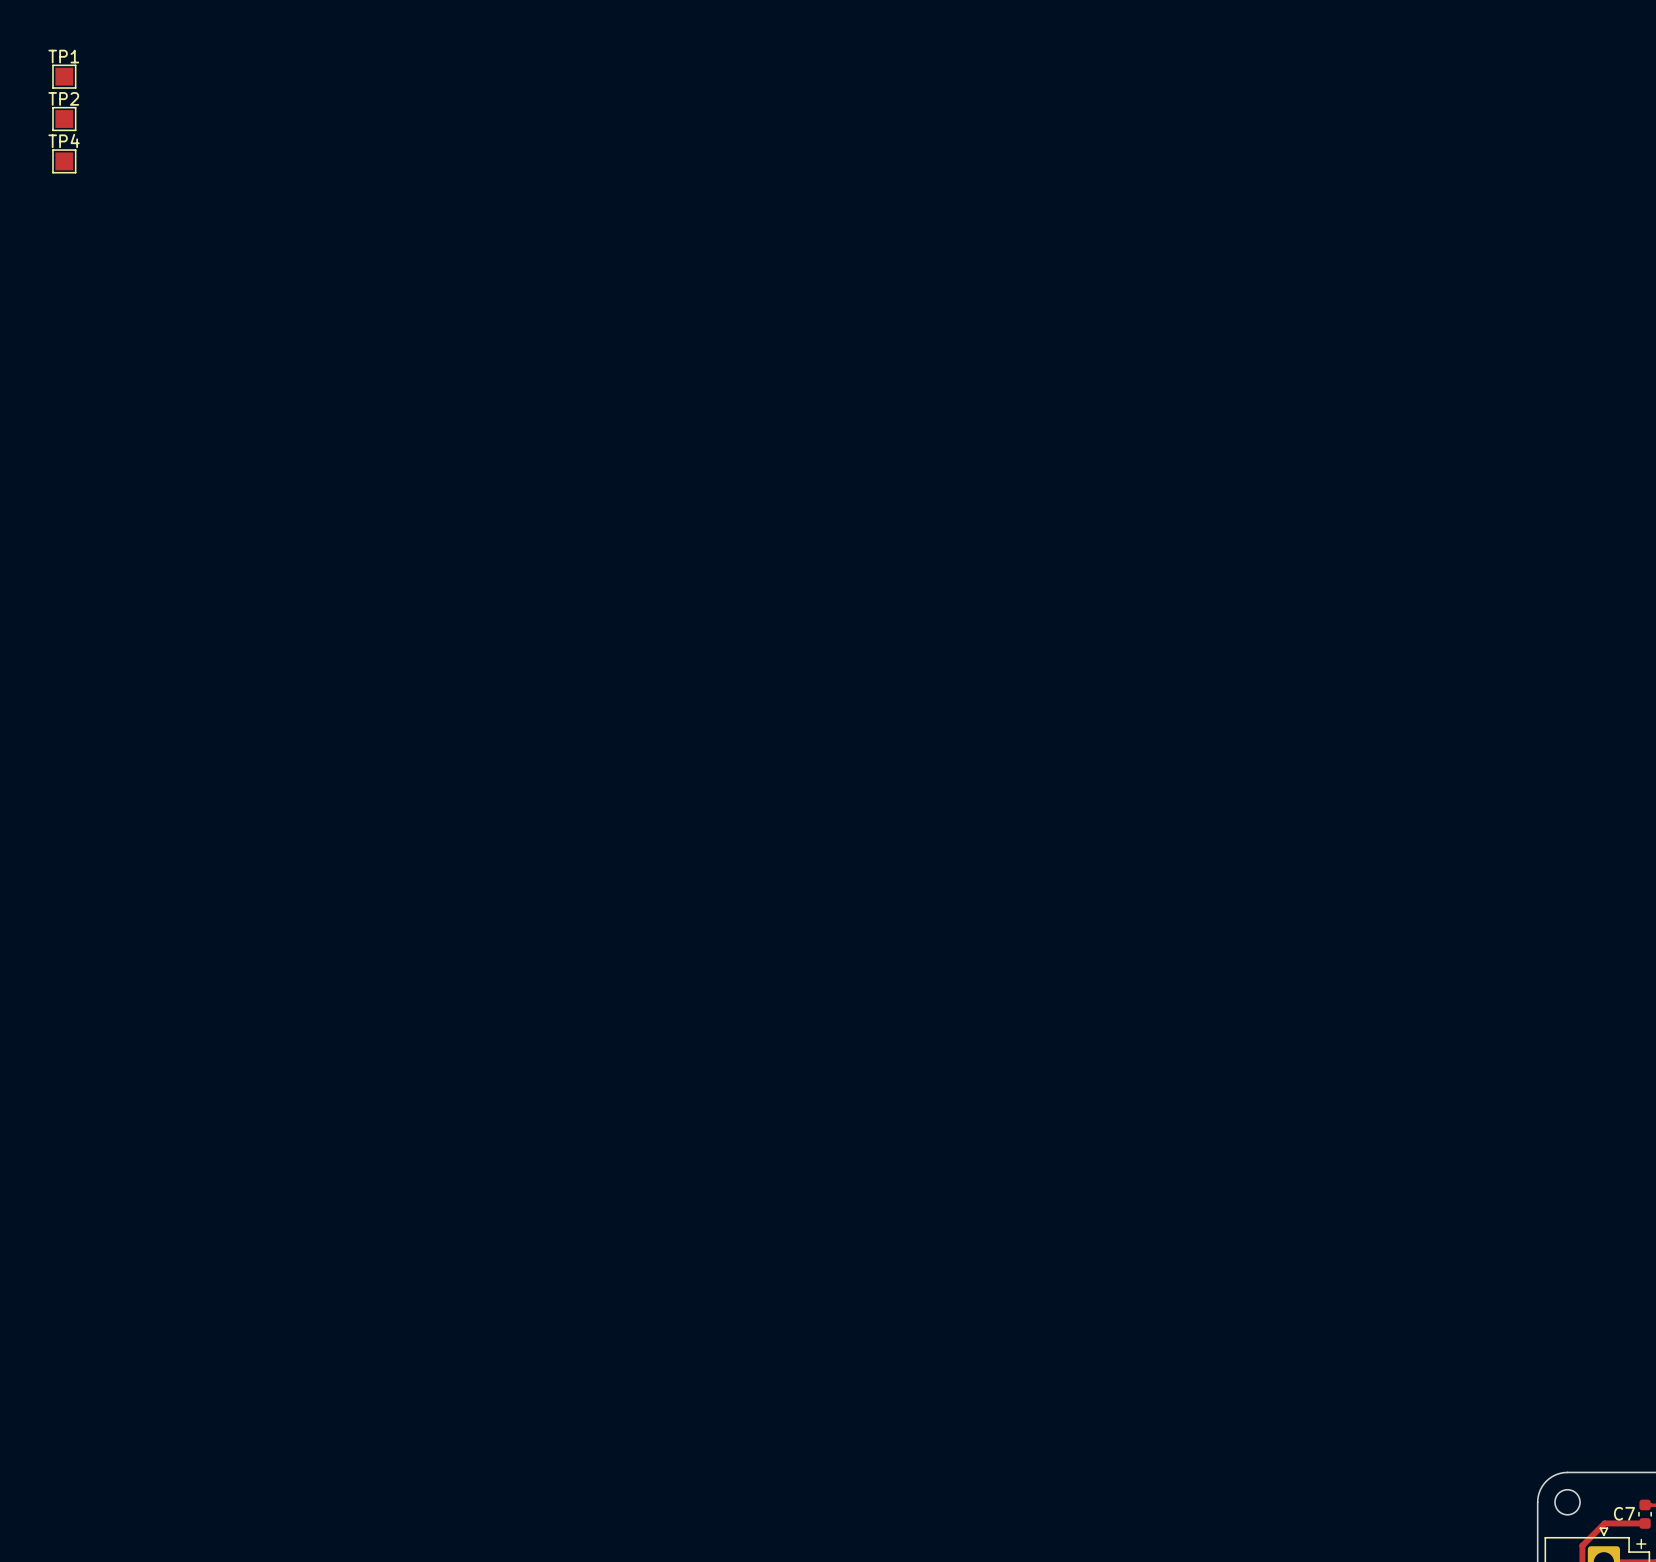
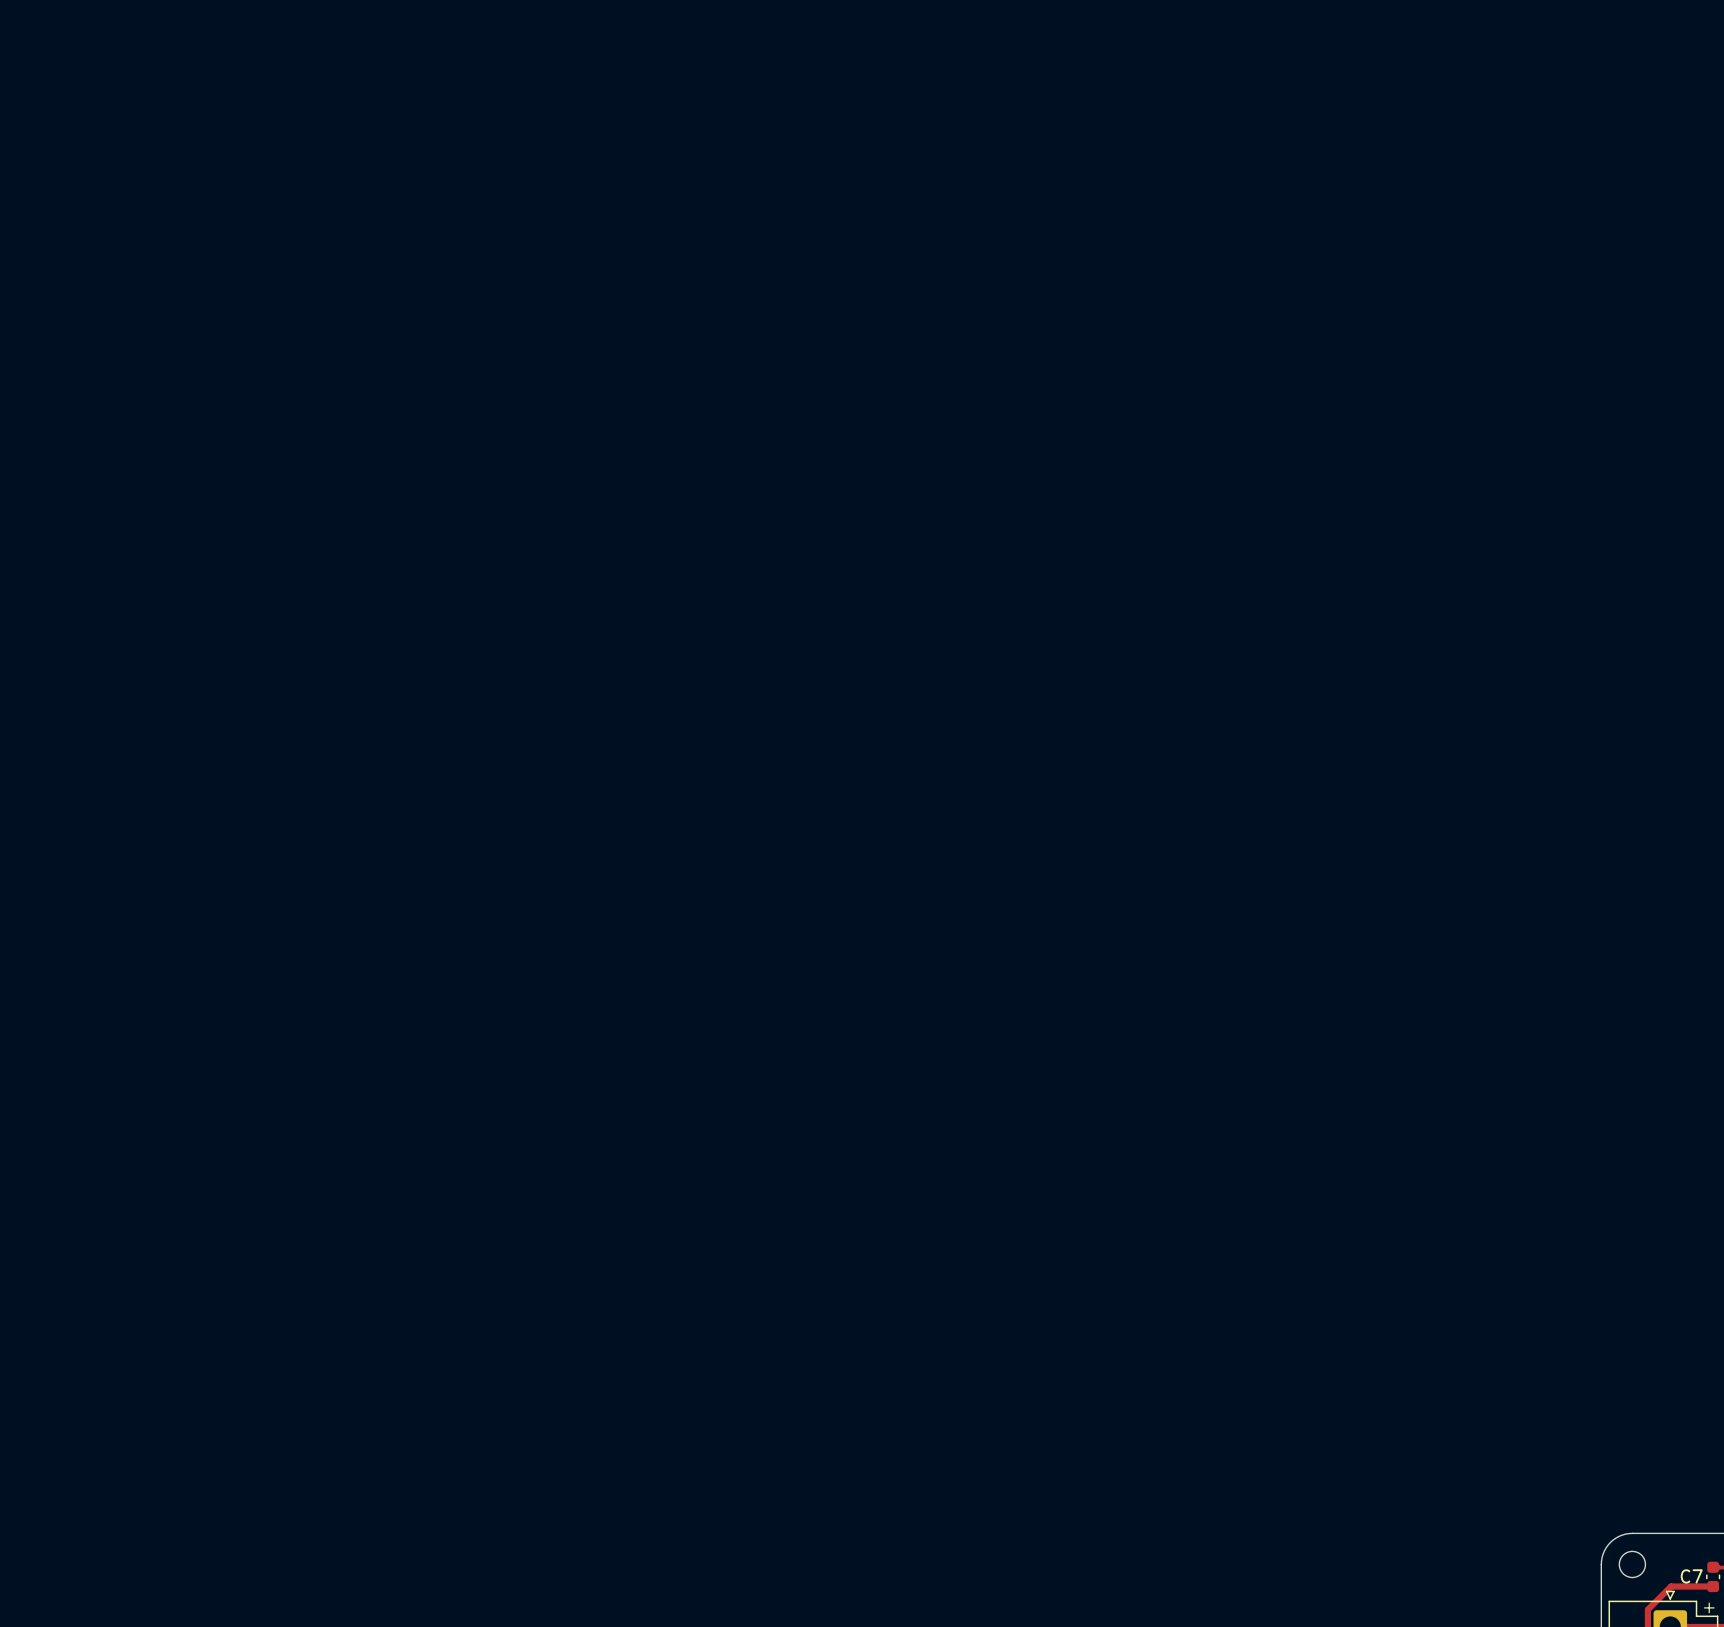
TP1: (64, 76) -> none
TP2: (64, 119) -> none
TP4: (64, 161) -> none

